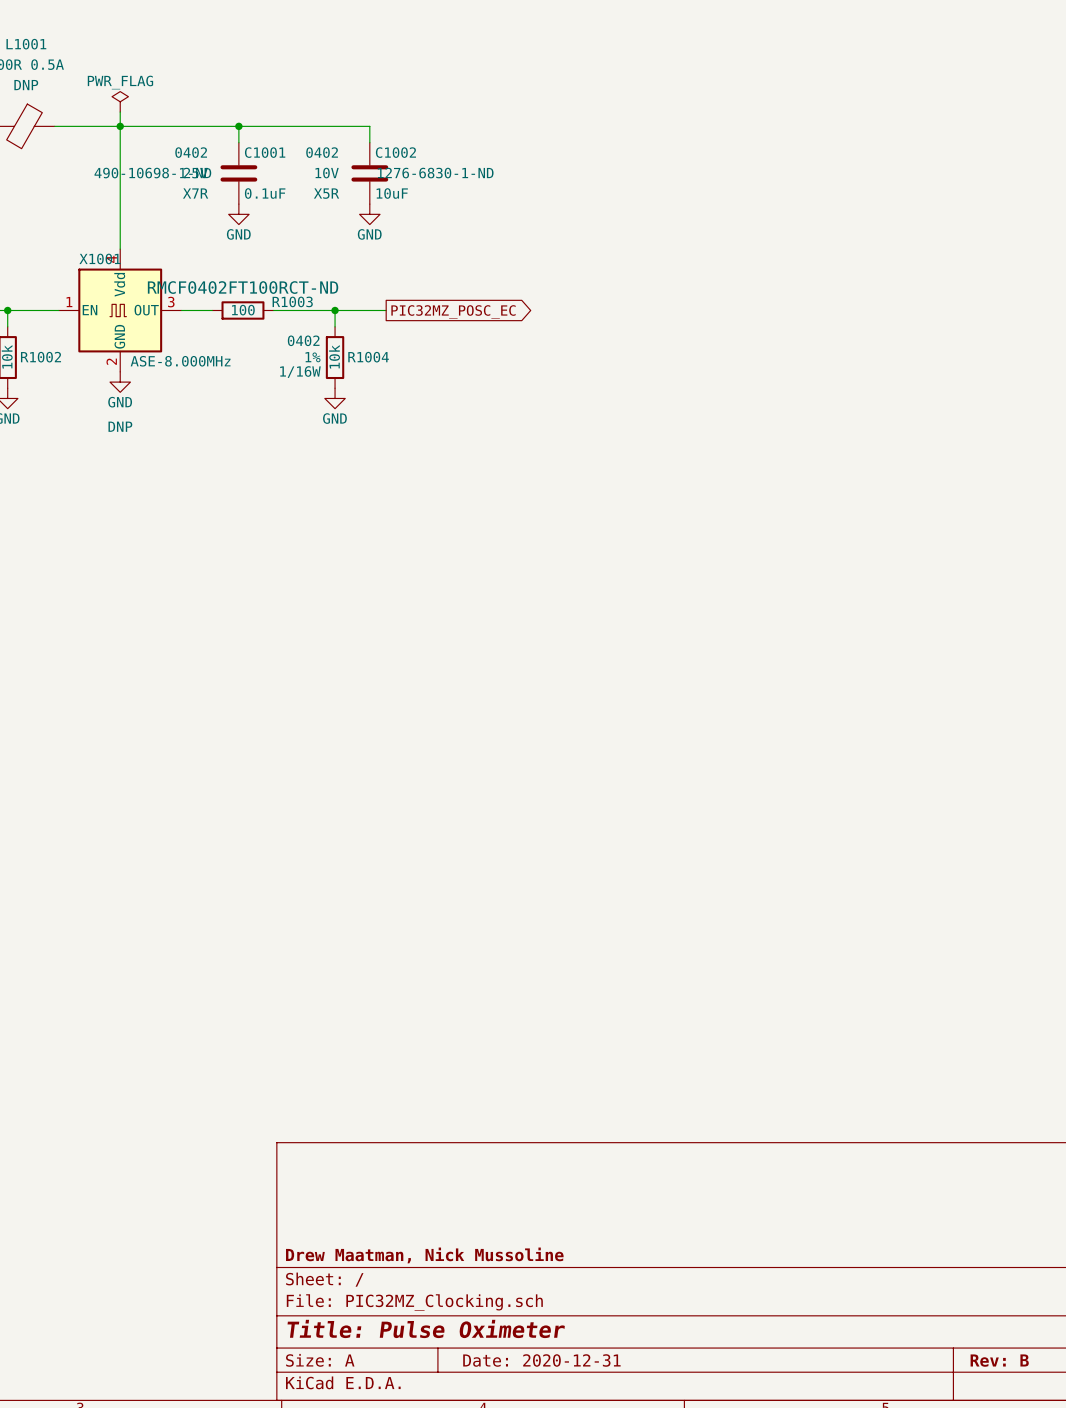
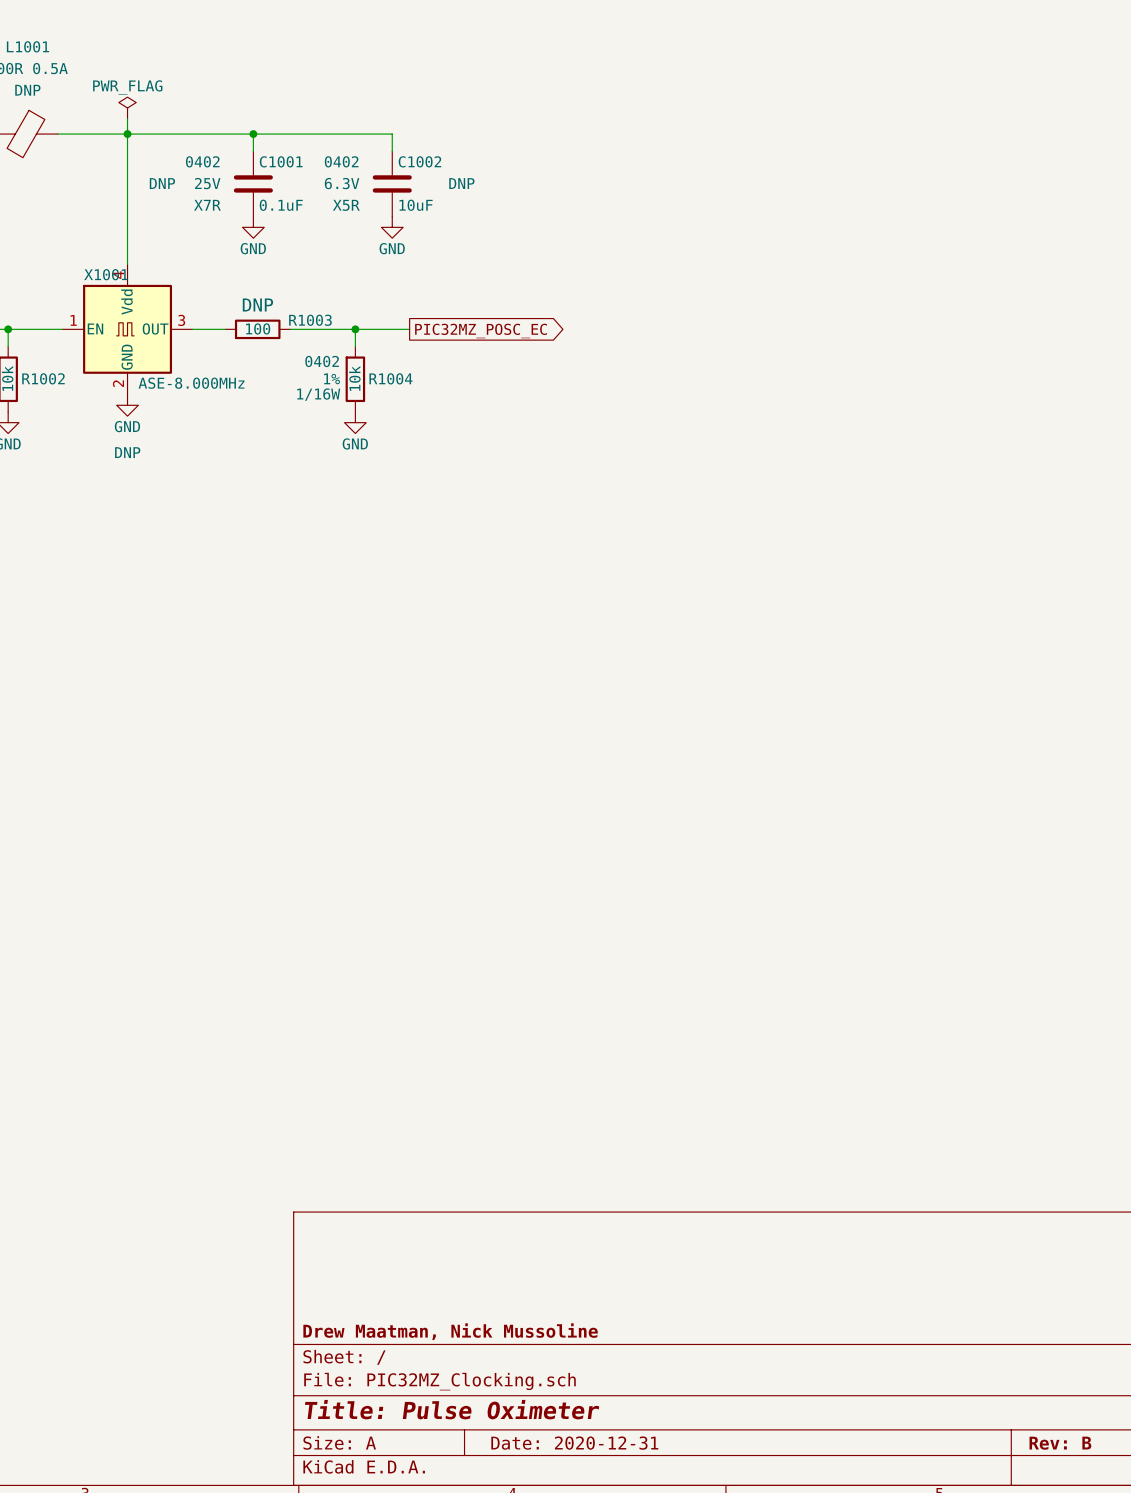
C1001 text: 490-10698-1-ND (152, 173) -> DNP (162, 183)
C1002 text: 10V (327, 173) -> 6.3V (342, 183)
C1002 text: 1276-6830-1-ND (435, 173) -> DNP (461, 183)
R1003 text: RMCF0402FT100RCT-ND (243, 287) -> DNP (257, 304)

